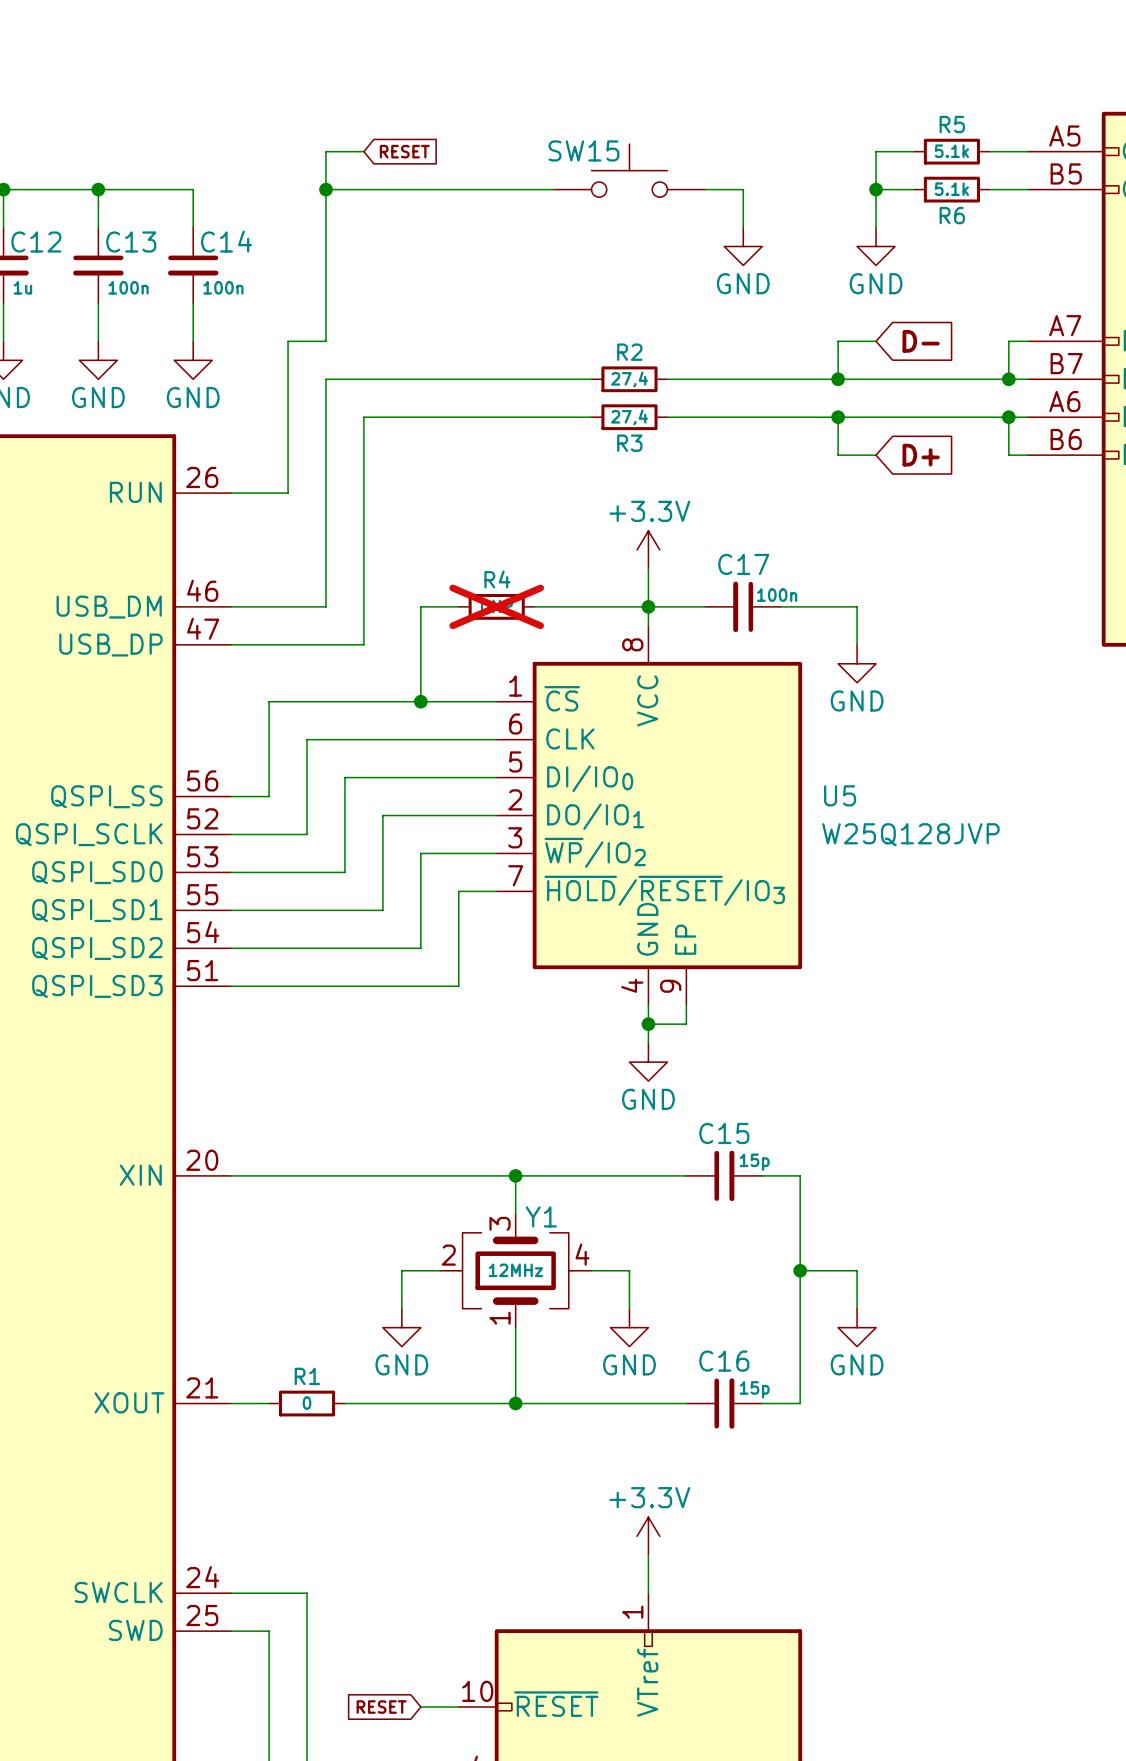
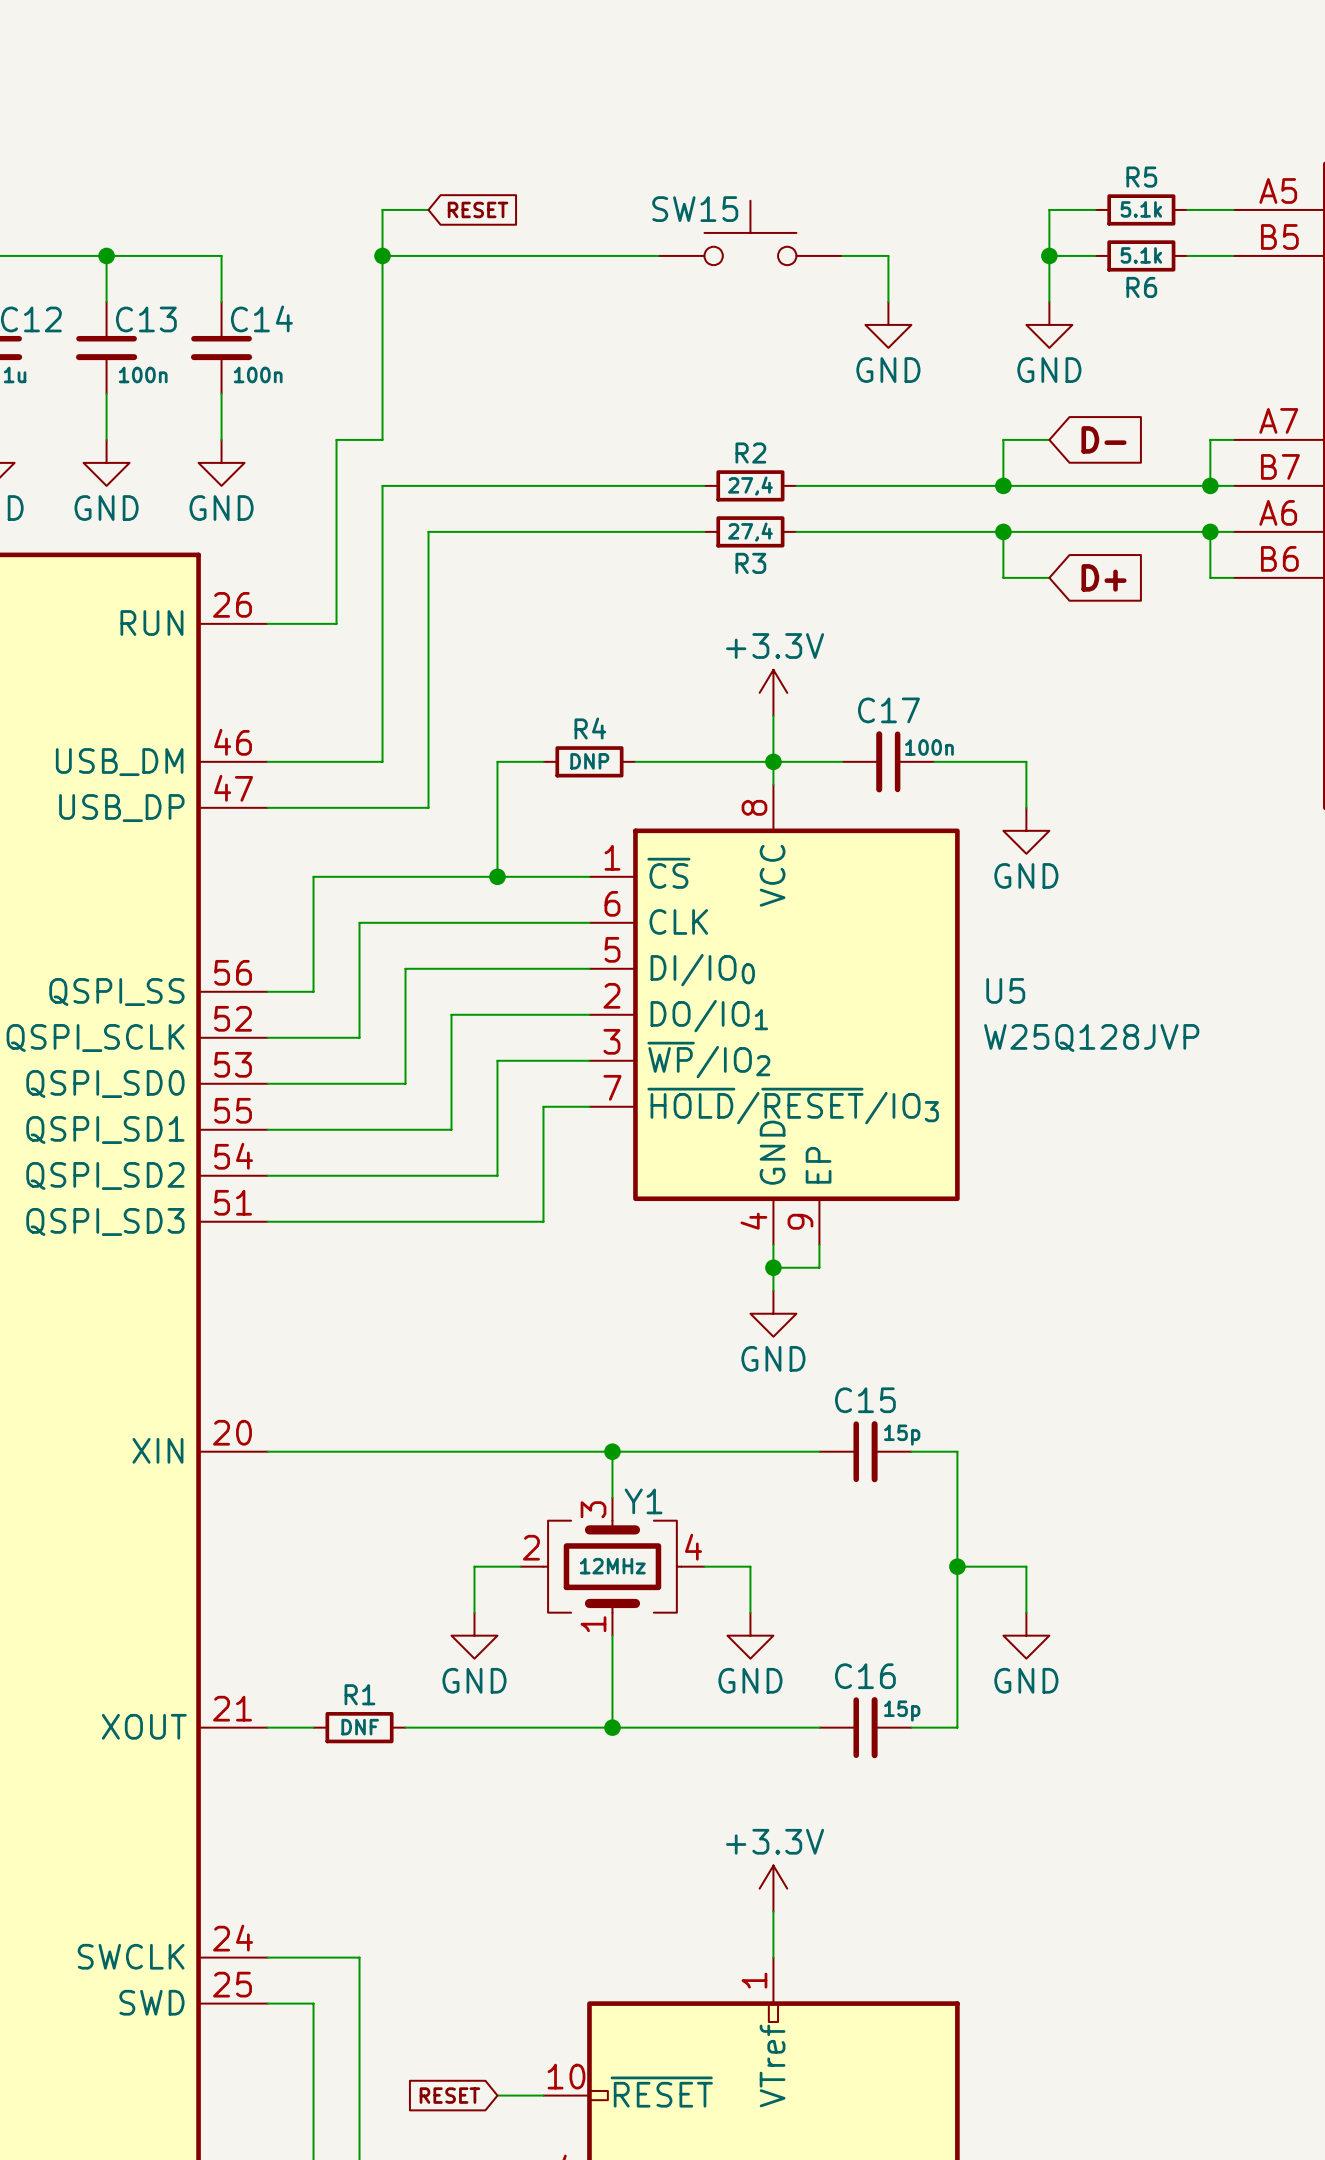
R4 do-not-place cross: (496, 606) -> none
R1 value: 0 (307, 1403) -> DNF (360, 1727)

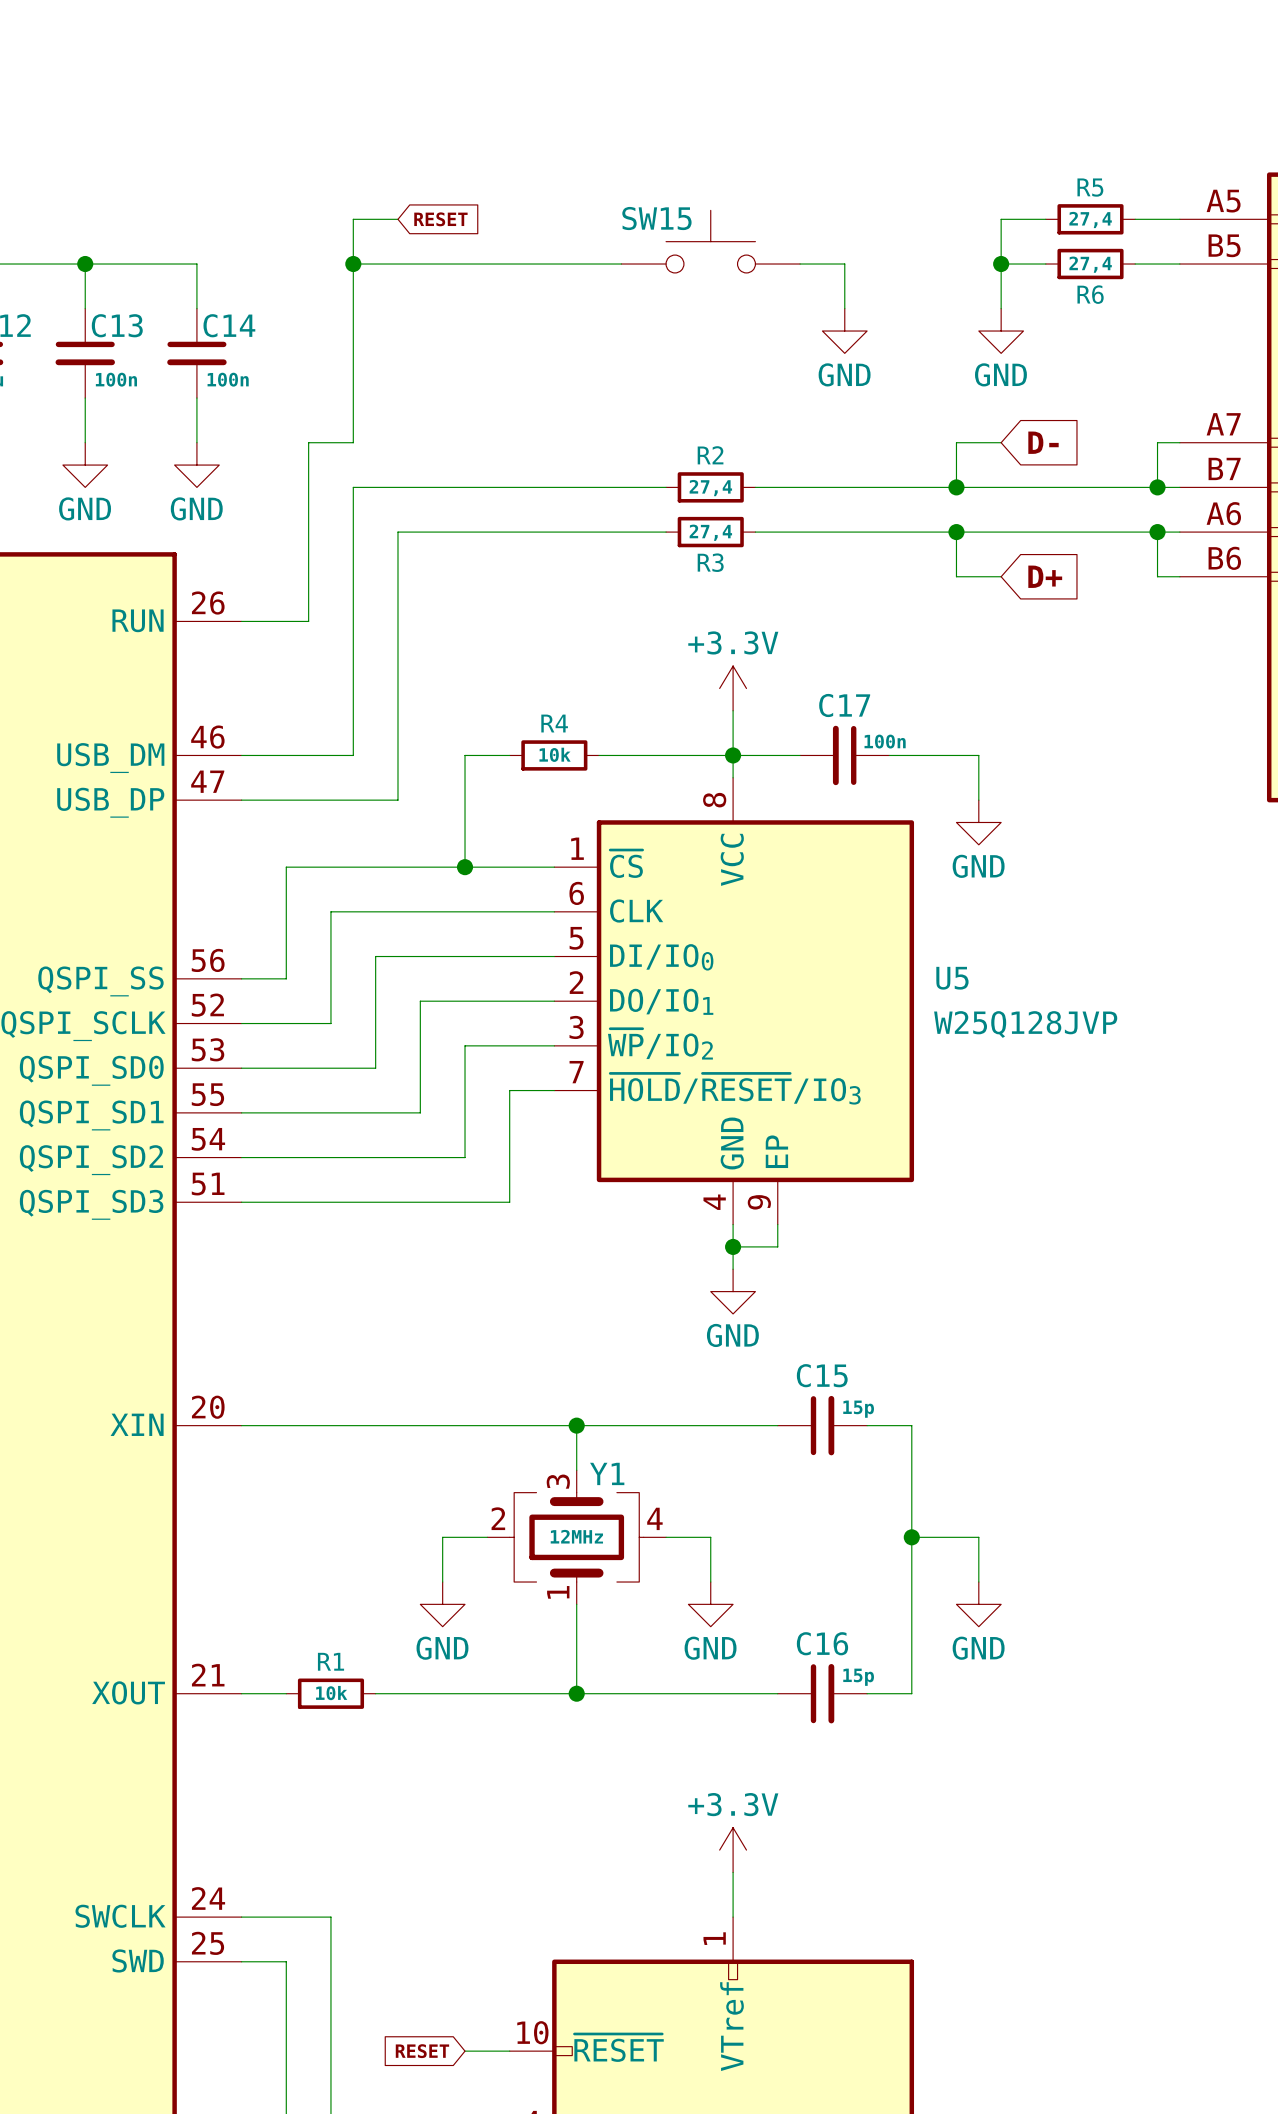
R5 value: 5.1k (1141, 209) -> 27,4 (1090, 219)
R6 value: 5.1k (1141, 255) -> 27,4 (1090, 264)
R4 value: DNP (589, 761) -> 10k (555, 754)
R1 value: DNF (360, 1727) -> 10k (331, 1693)

